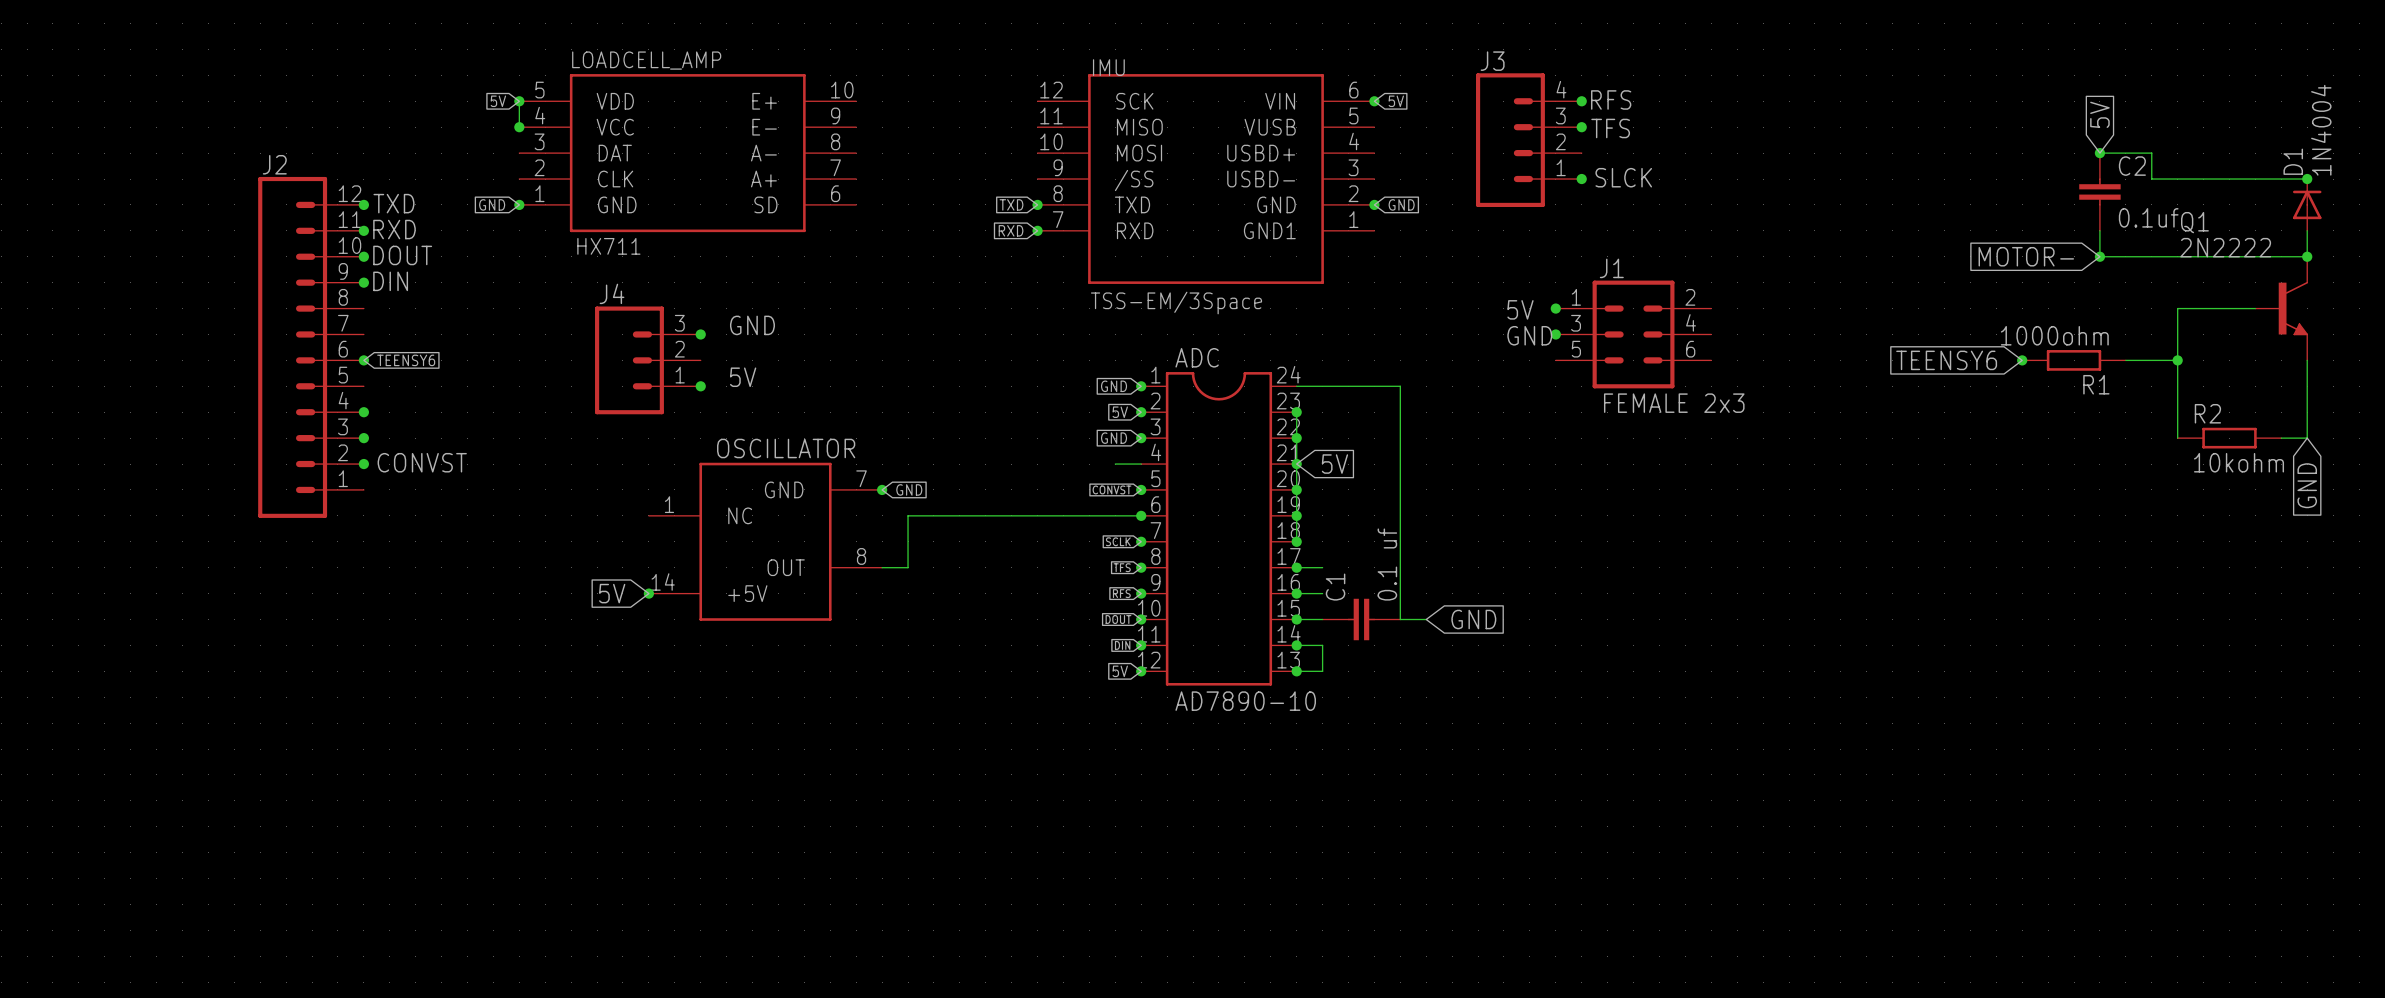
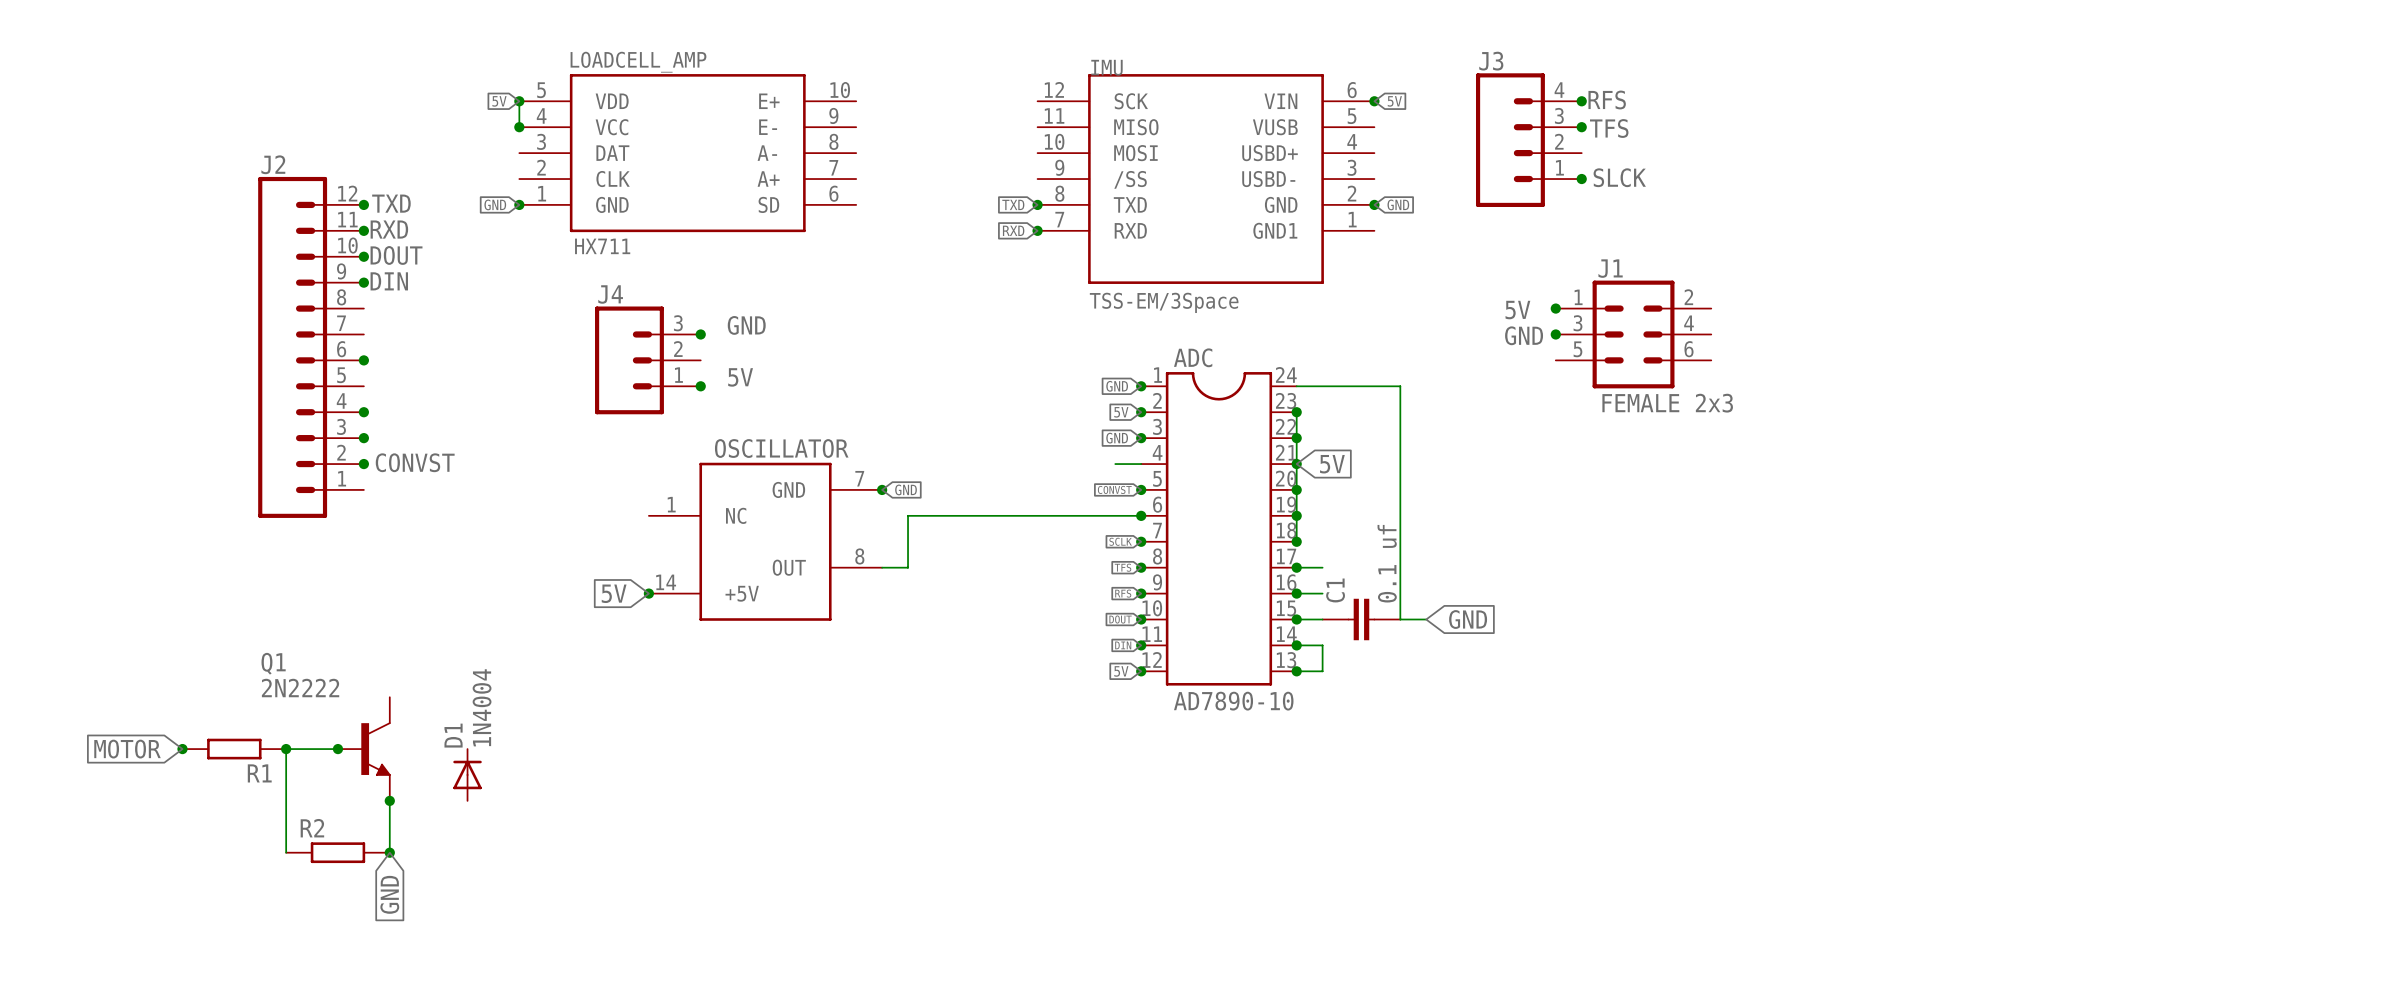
global label: 5V (2099, 114) -> none
wire: (2099, 153) (2151, 153) (2151, 179) (2307, 179) -> none
junction: (2099, 153) -> none
junction: (2307, 179) -> none
C2: 0.1uf (2099, 191) -> none
D1 position: (2307, 204) -> (467, 774)
wire: (2099, 230) (2099, 256) (2307, 256) (2307, 230) -> none
global label: MOTOR- (2026, 256) -> none
junction: (2099, 256) -> none
junction: (2307, 256) -> none
wire: (2255, 308) (2177, 308) (2177, 438) -> none
Q1 position: (2281, 308) -> (364, 749)
R1 value: 1000ohm (2054, 335) -> none
global label: TEENSY6 (406, 360) -> none
global label: TEENSY6 (1946, 360) -> none
junction: (2022, 360) -> none
R1 position: (2074, 360) -> (234, 749)
wire: (2125, 360) (2177, 360) -> none
junction: (2177, 360) -> none
wire: (2307, 360) (2307, 438) (2281, 438) -> none
R2 position: (2229, 438) -> (337, 852)
R2 value: 10kohm (2239, 462) -> none
global label: GND (2307, 485) -> none
global label: none -> MOTOR (127, 749)
junction: none -> (182, 749)
junction: none -> (286, 749)
wire: none -> (337, 749) (286, 749) (286, 852)
junction: none -> (337, 749)
wire: none -> (389, 800) (389, 852)
junction: none -> (389, 800)
junction: none -> (389, 852)
global label: none -> GND (389, 894)

